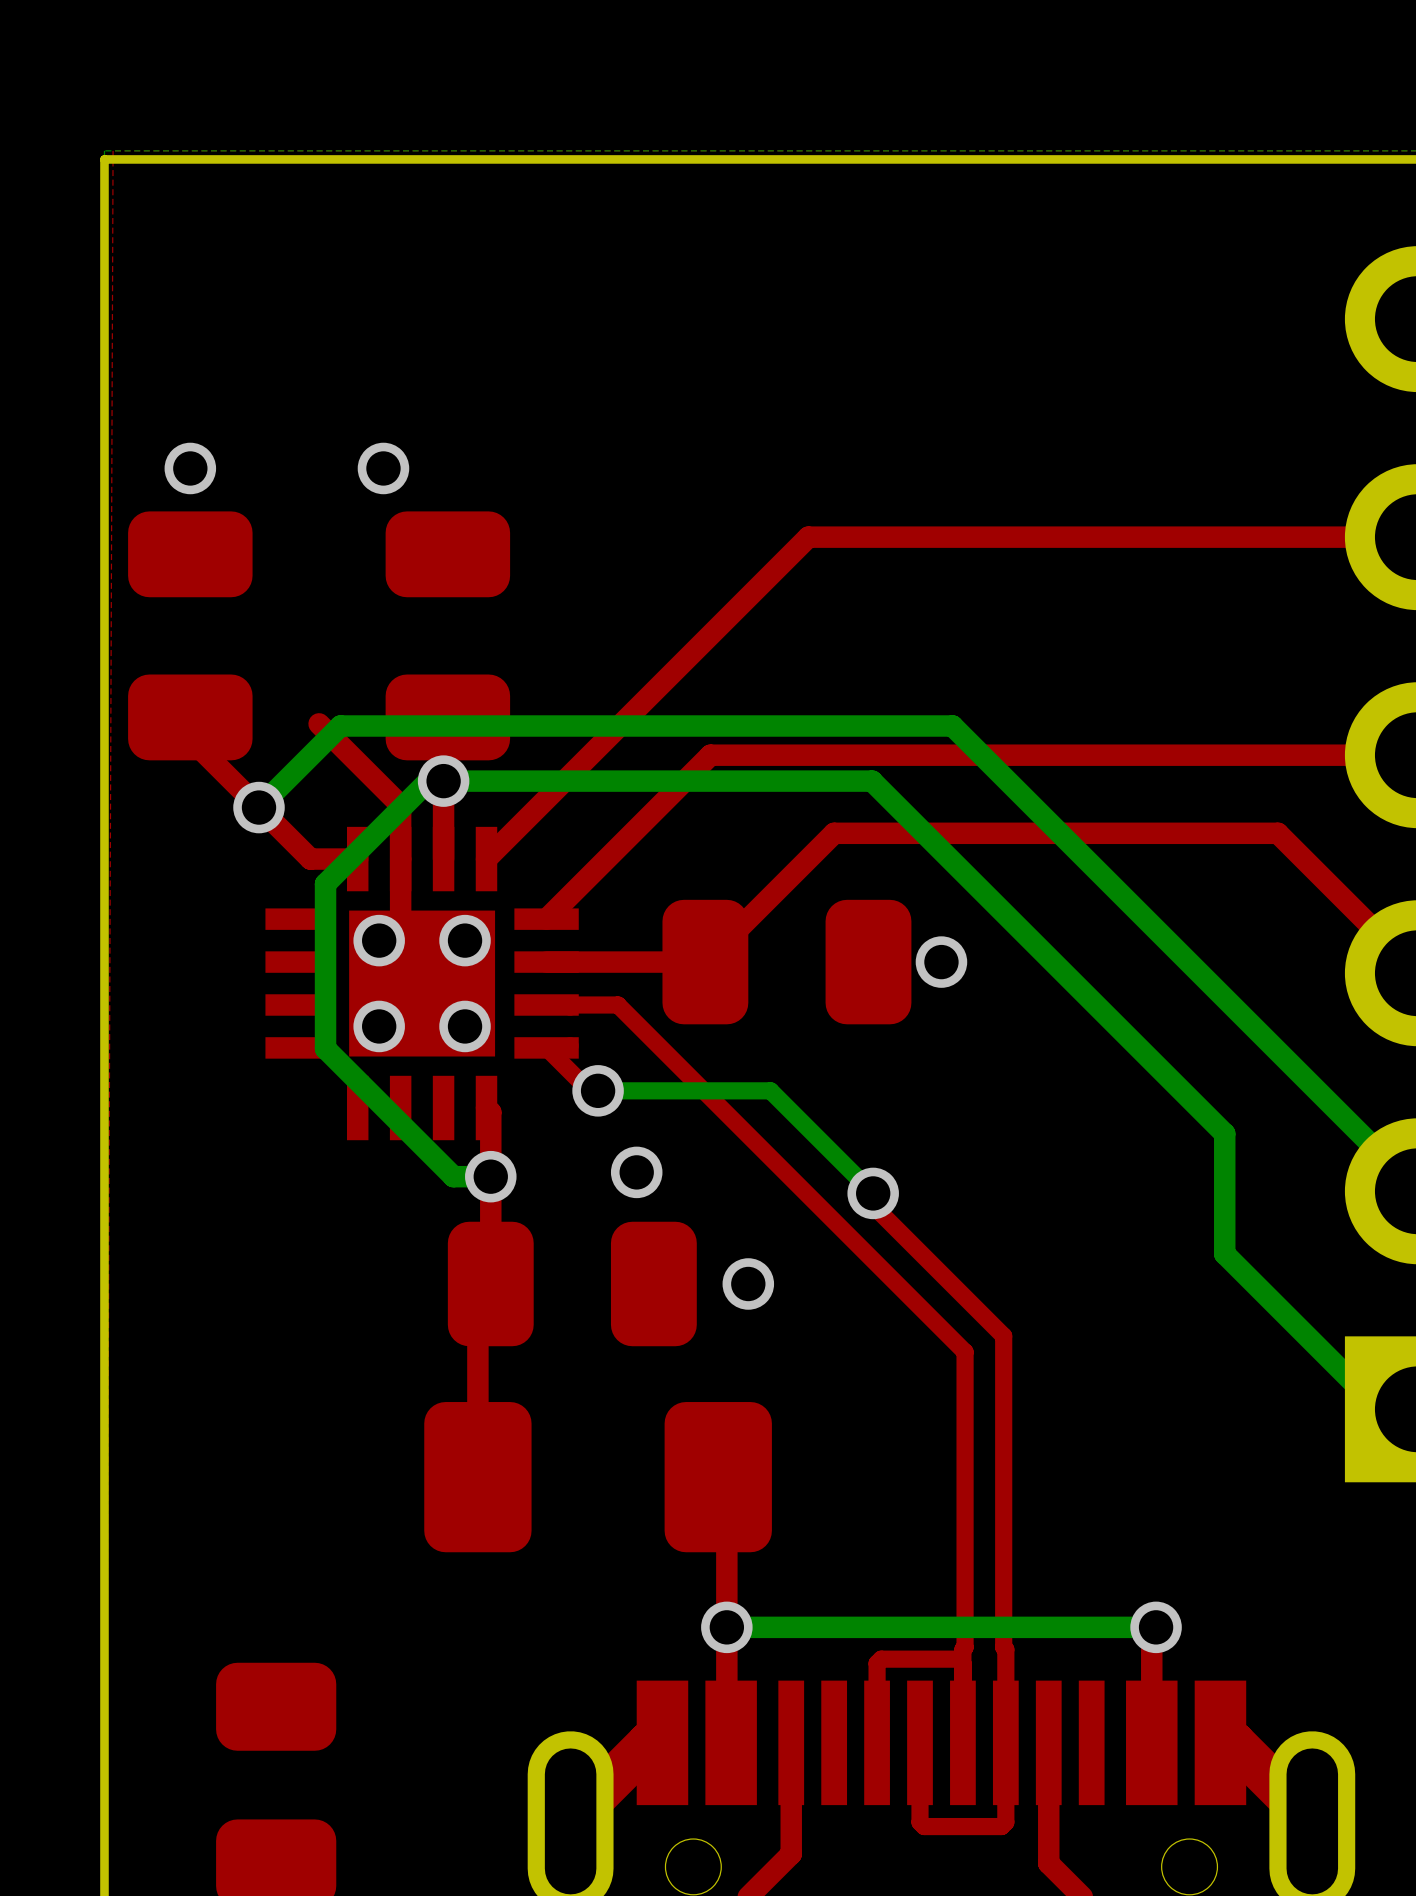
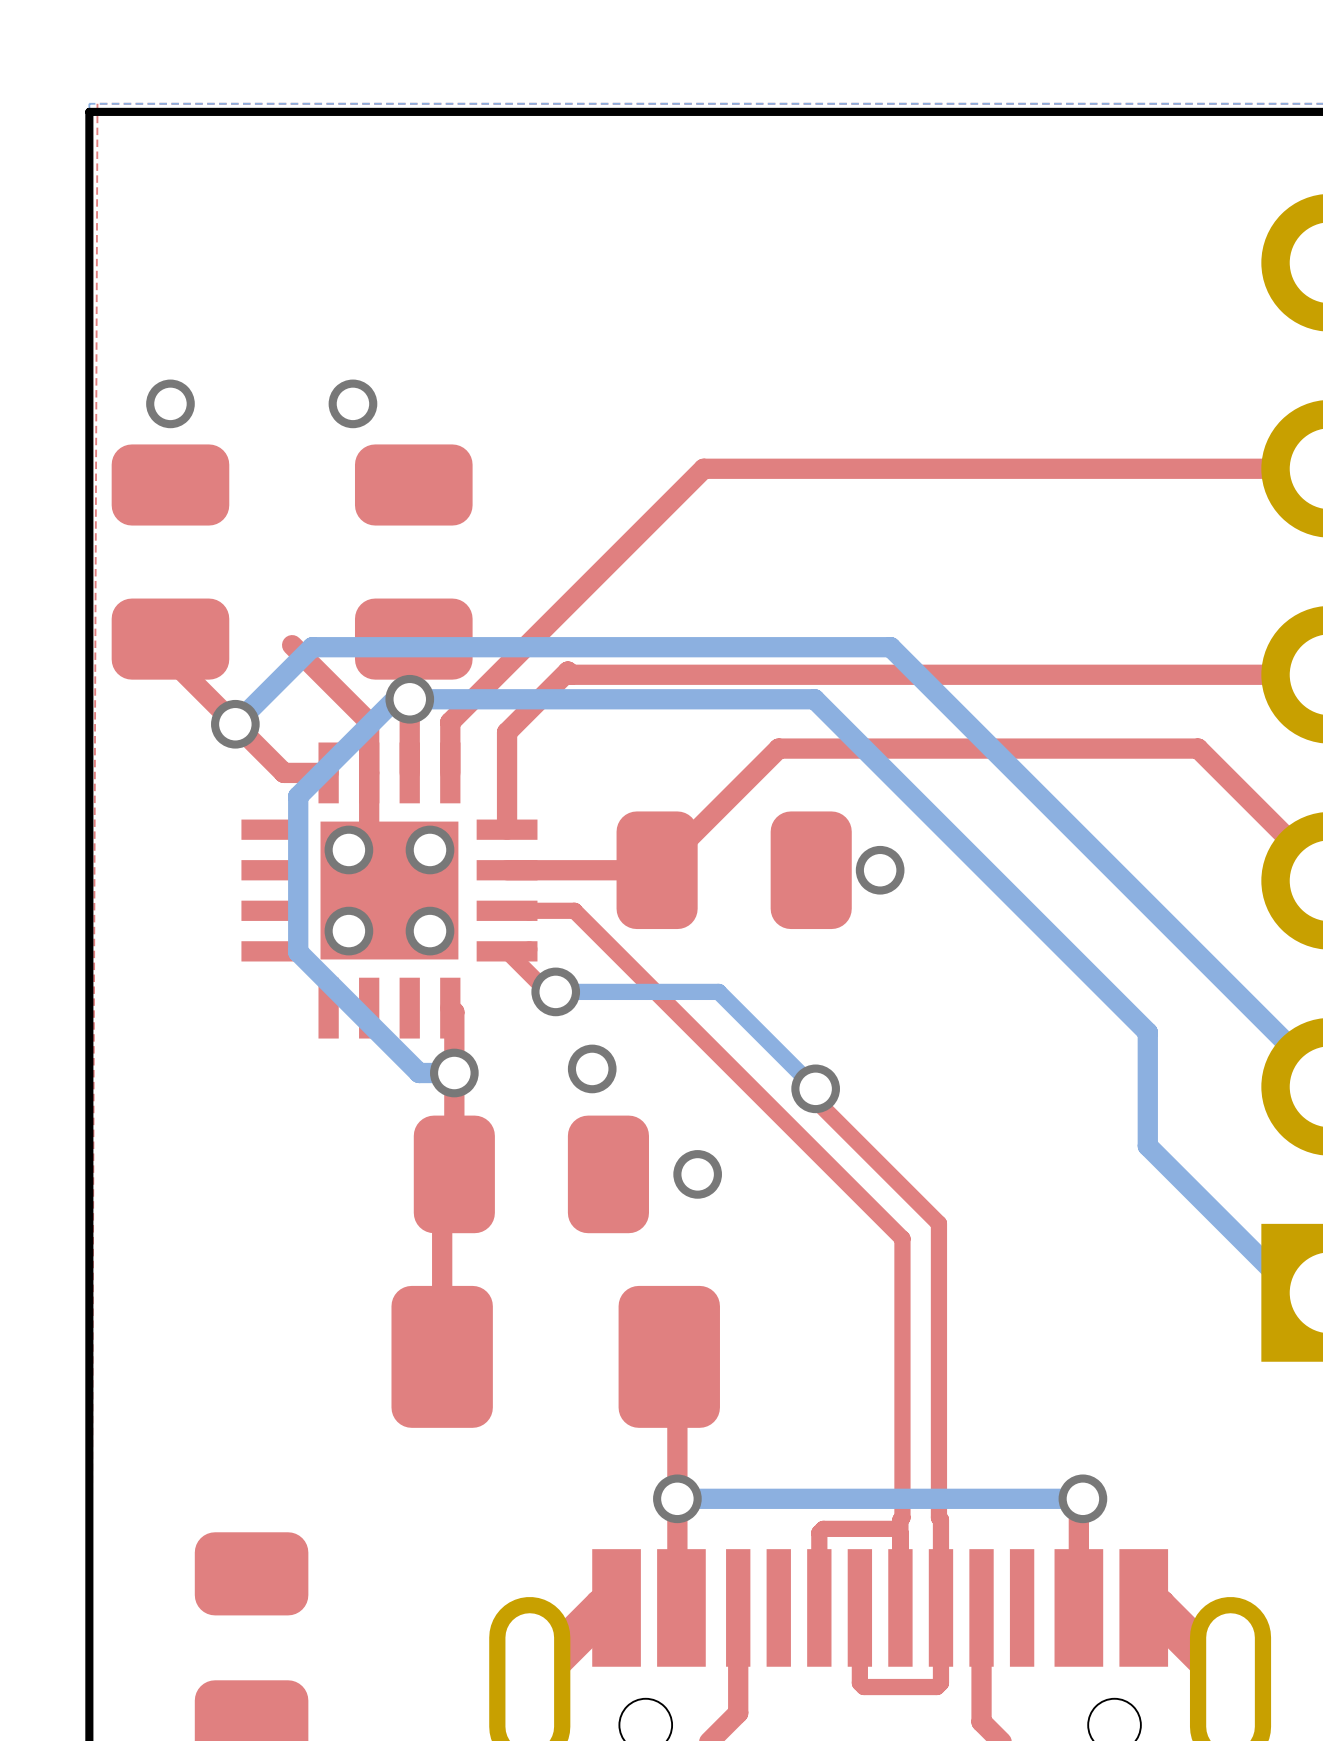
top track: (808, 537) (486, 859) -> (754, 468) (703, 468) (450, 722) (450, 772)
top track: (710, 755) (546, 919) -> (661, 674) (571, 674) (567, 671) (507, 732) (507, 829)

